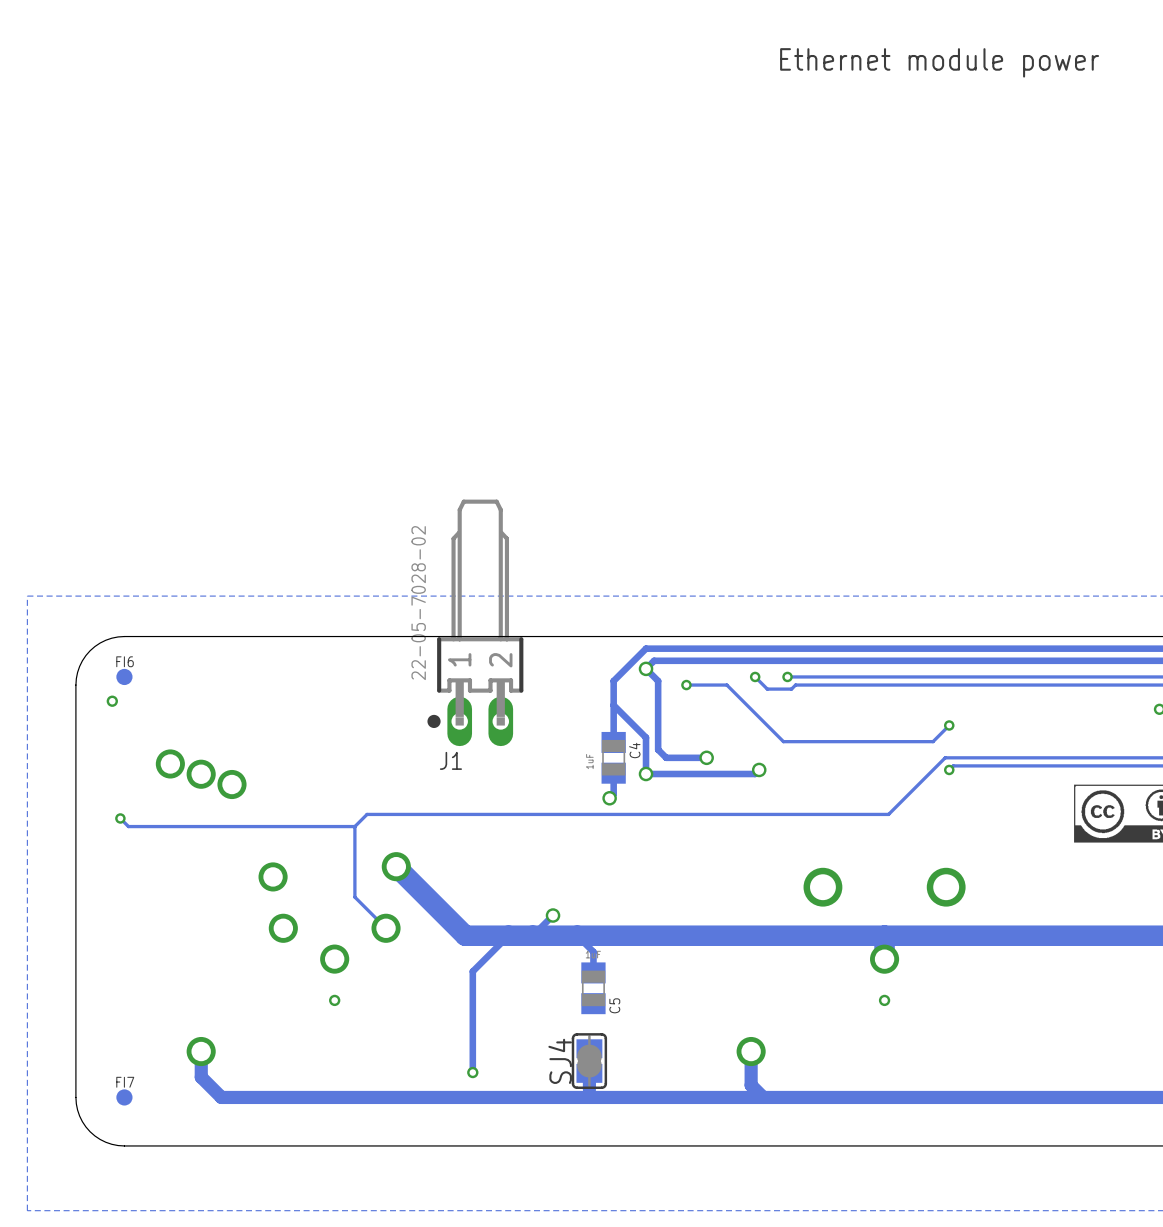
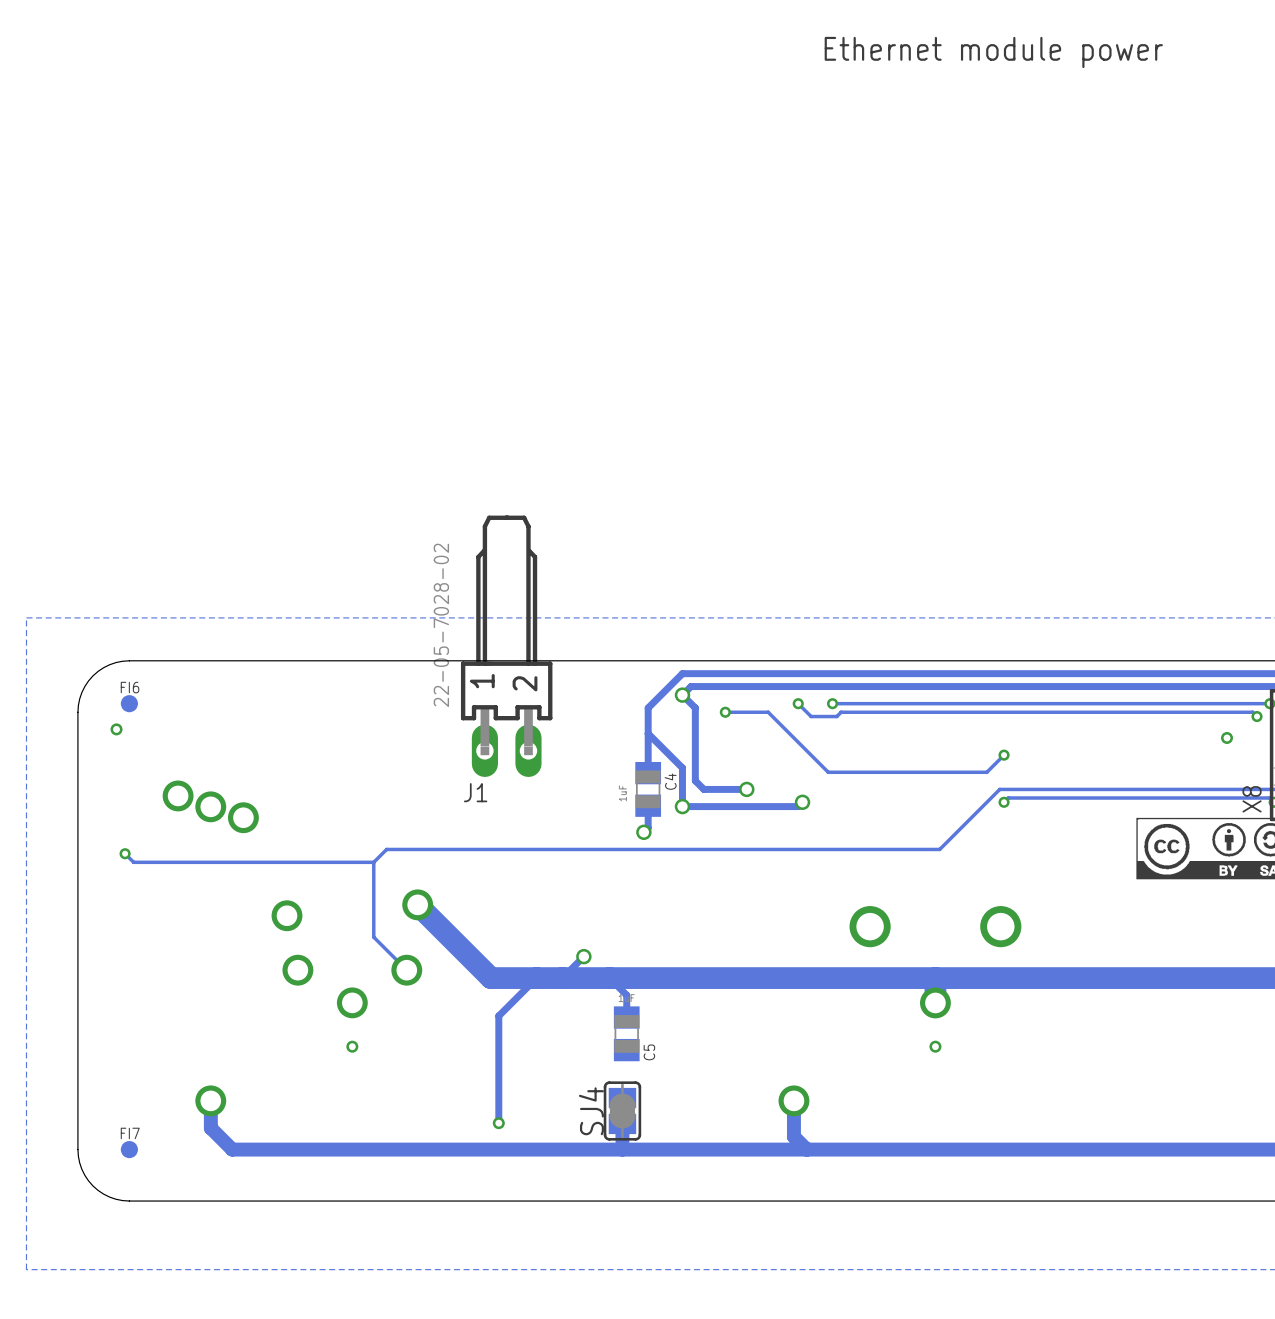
J1 footprint: [427, 499, 524, 747] -> [460, 515, 553, 777]

